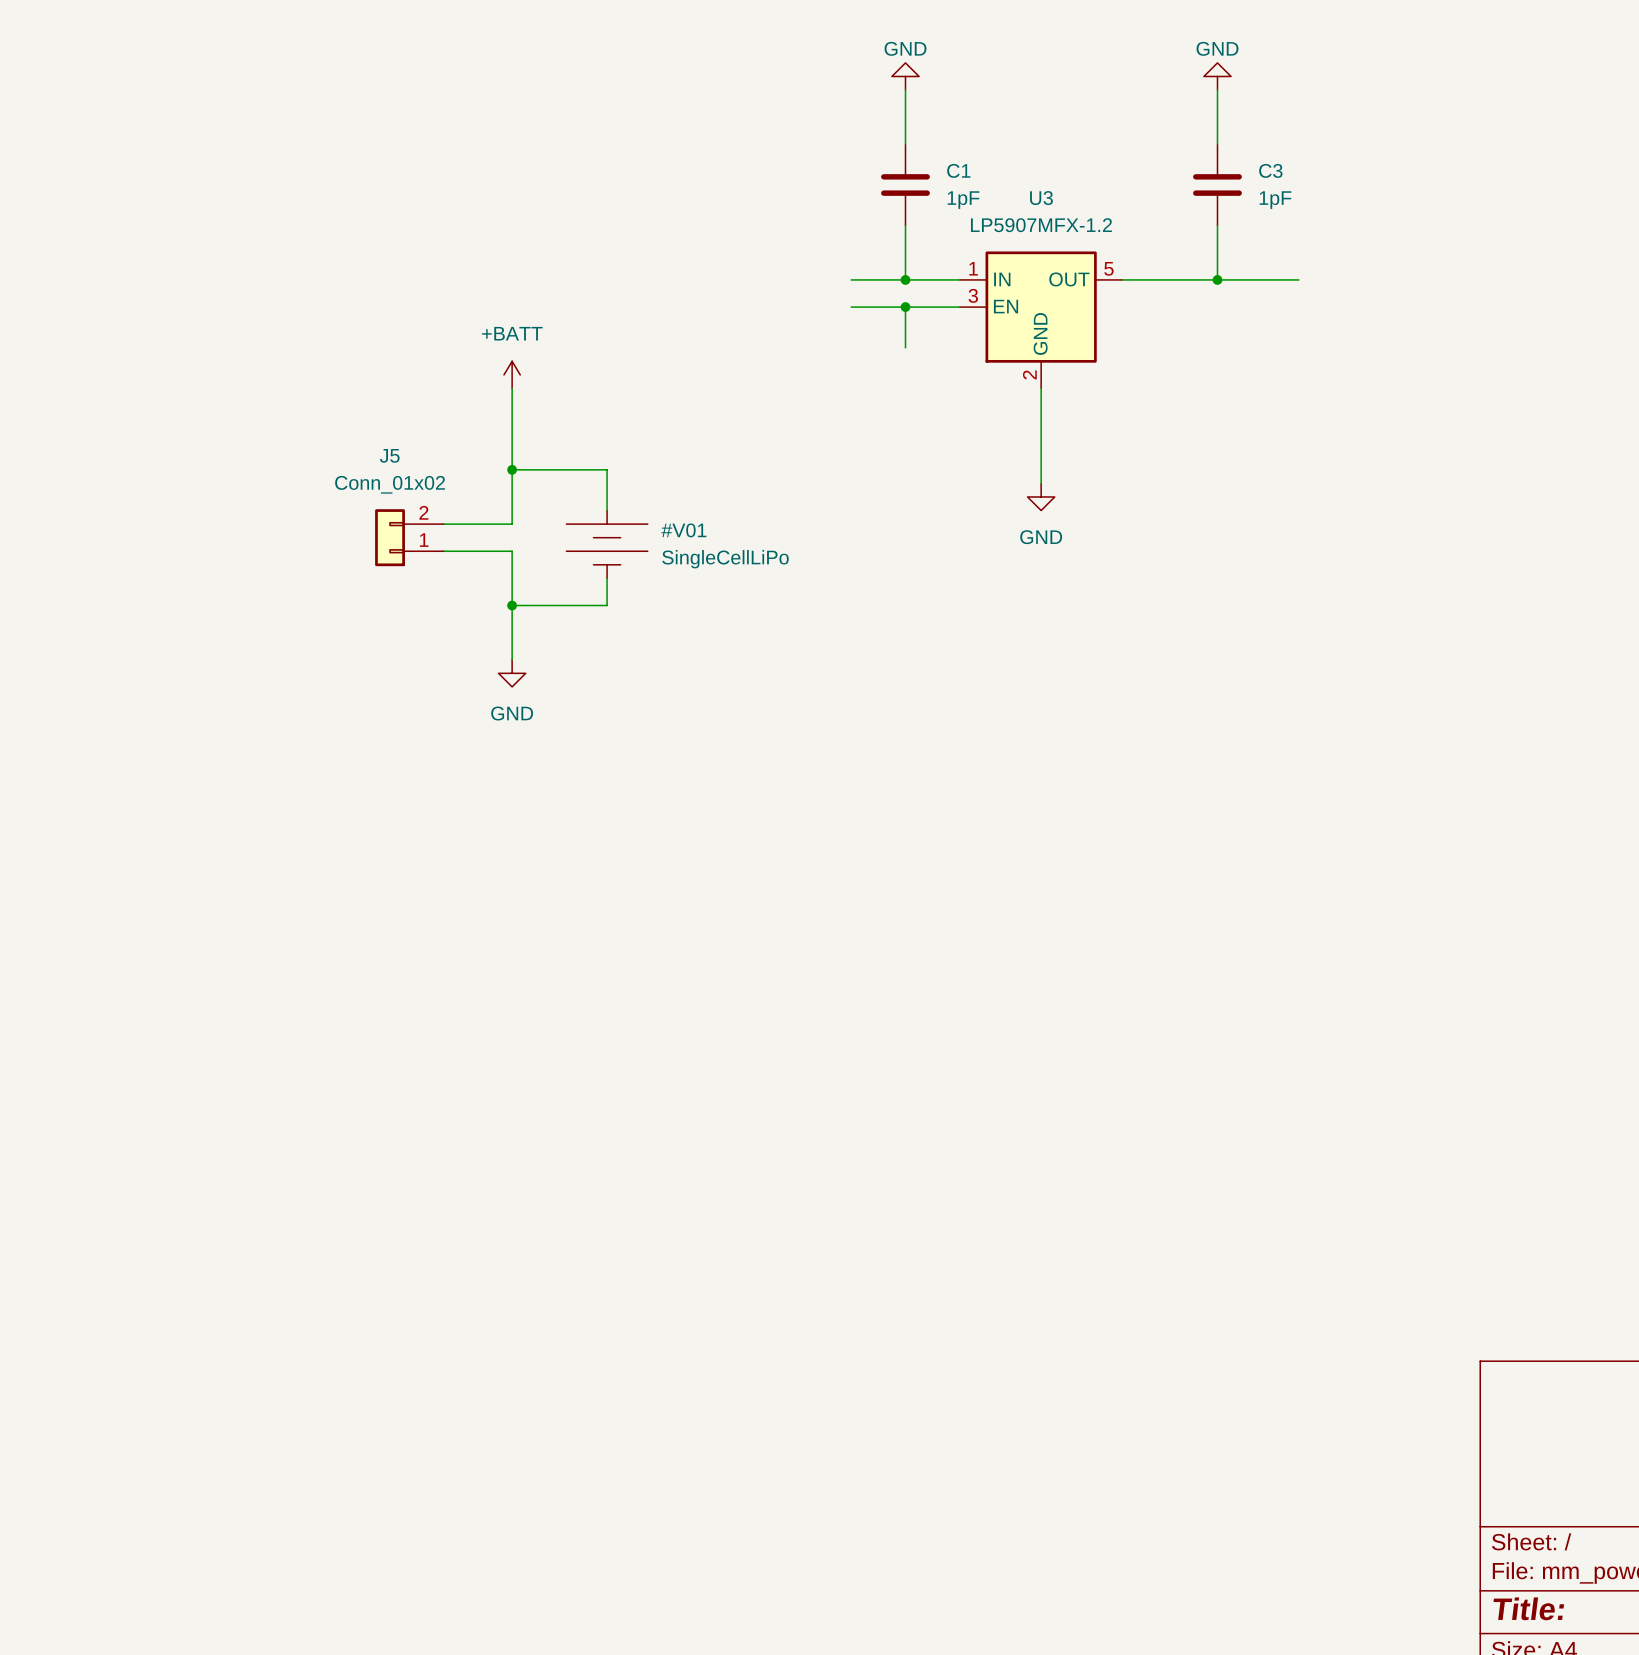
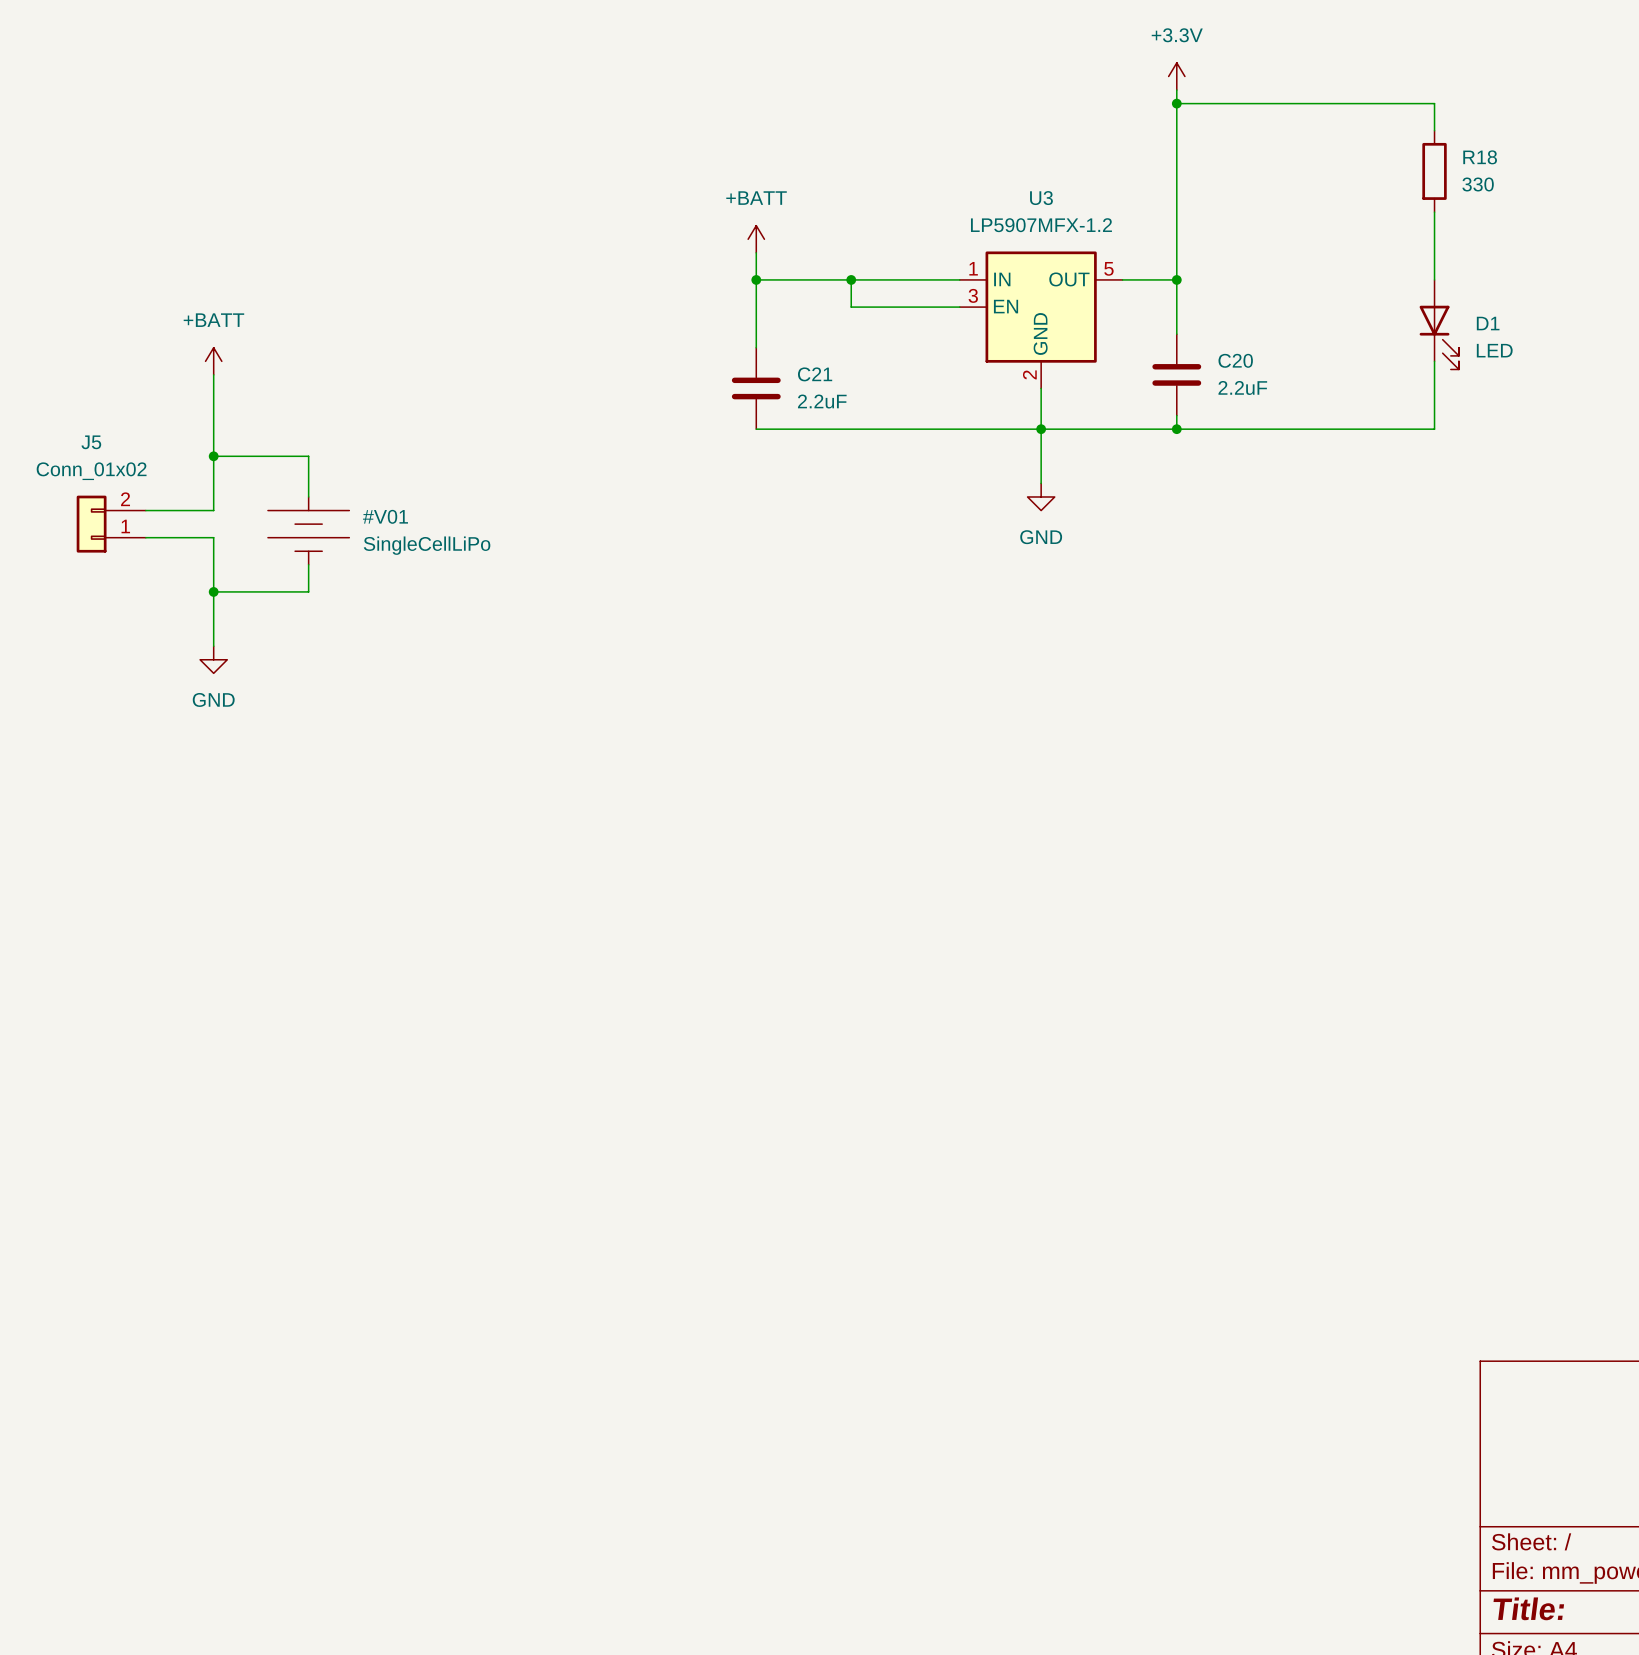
power symbol: GND (905, 76) -> none
power symbol: none -> +3.3V (1176, 76)
power symbol: GND (1217, 76) -> none
wire: (905, 90) (905, 144) -> none
wire: none -> (1176, 90) (1176, 334)
wire: (1217, 90) (1217, 144) -> none
wire: none -> (1176, 103) (1434, 103) (1434, 130)
junction: none -> (1176, 103)
R18: none -> 330 (1434, 171)
C1: 1pF (905, 185) -> none
C3: 1pF (1217, 185) -> none
wire: none -> (1434, 212) (1434, 279)
wire: (905, 225) (905, 279) -> none
wire: (1217, 225) (1217, 279) -> none
power symbol: none -> +BATT (756, 239)
wire: none -> (756, 252) (756, 347)
wire: none -> (756, 279) (851, 279) (851, 307)
junction: none -> (756, 279)
junction: none -> (851, 279)
junction: (905, 279) -> none
wire: (1176, 279) (1298, 279) -> none
junction position: (1217, 279) -> (1176, 279)
wire: (905, 307) (905, 347) -> none
junction: (905, 307) -> none
D1: none -> LED (1439, 324)
power symbol: none -> +BATT (213, 361)
wire: none -> (1434, 361) (1434, 429) (756, 429)
wire: none -> (213, 374) (213, 510) (145, 510)
power symbol: +BATT (512, 374) -> none
C20: none -> 2.2uF (1176, 374)
wire: (512, 388) (512, 524) (444, 524) -> none
C21: none -> 2.2uF (756, 388)
wire: none -> (1176, 415) (1176, 429)
junction: none -> (1041, 429)
junction: none -> (1176, 429)
wire: none -> (213, 456) (308, 456) (308, 496)
junction: none -> (213, 456)
wire: (512, 469) (607, 469) (607, 510) -> none
junction: (512, 469) -> none
wire: none -> (145, 537) (213, 537) (213, 646)
J5 position: (409, 537) -> (111, 524)
#V01 position: SingleCellLiPo (607, 544) -> SingleCellLiPo (308, 530)
wire: (444, 551) (512, 551) (512, 659) -> none
wire: none -> (308, 564) (308, 591) (213, 591)
wire: (607, 578) (607, 605) (512, 605) -> none
junction: none -> (213, 591)
junction: (512, 605) -> none
power symbol: none -> GND (213, 659)
power symbol: GND (512, 673) -> none

